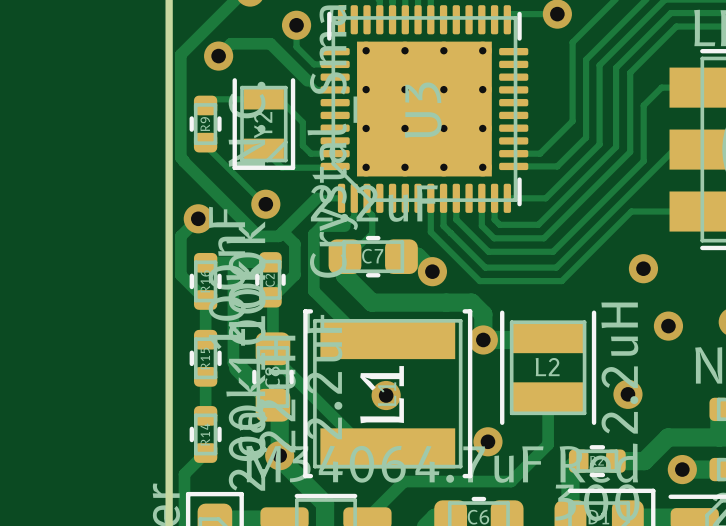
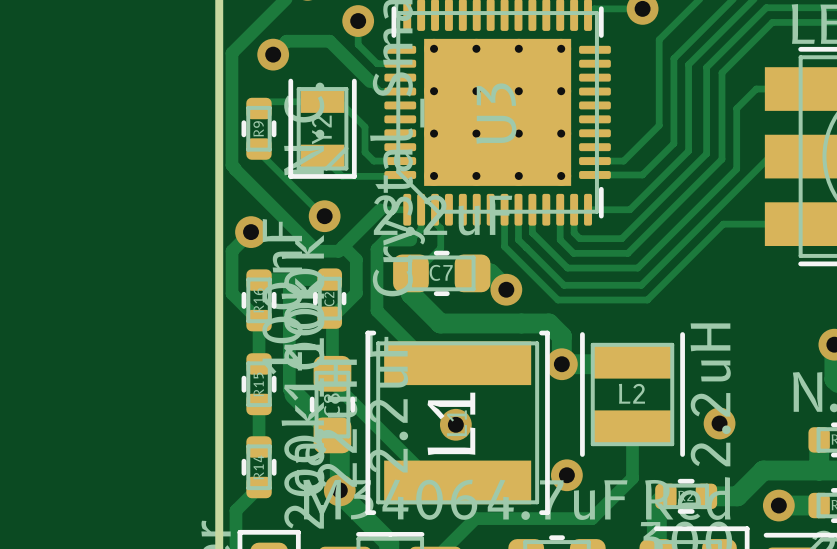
via: (643, 268) -> none
via: (668, 326) -> none

